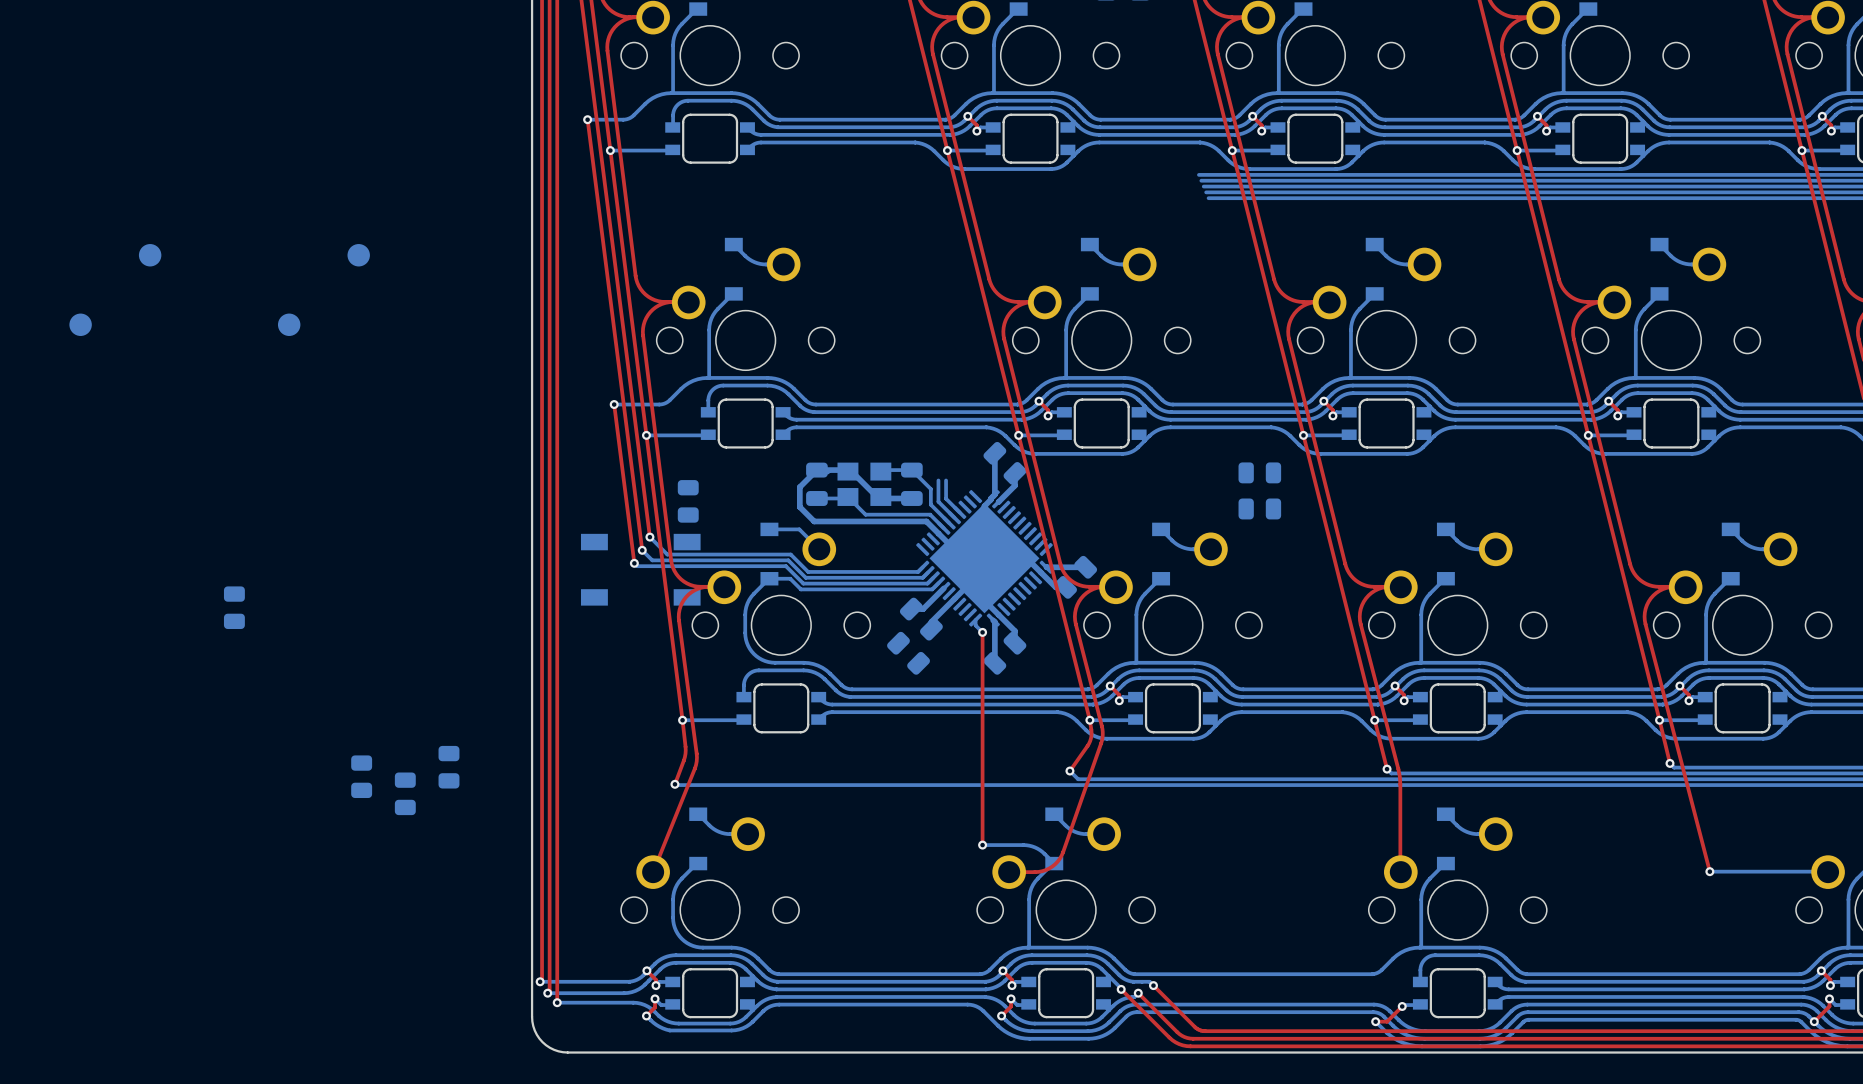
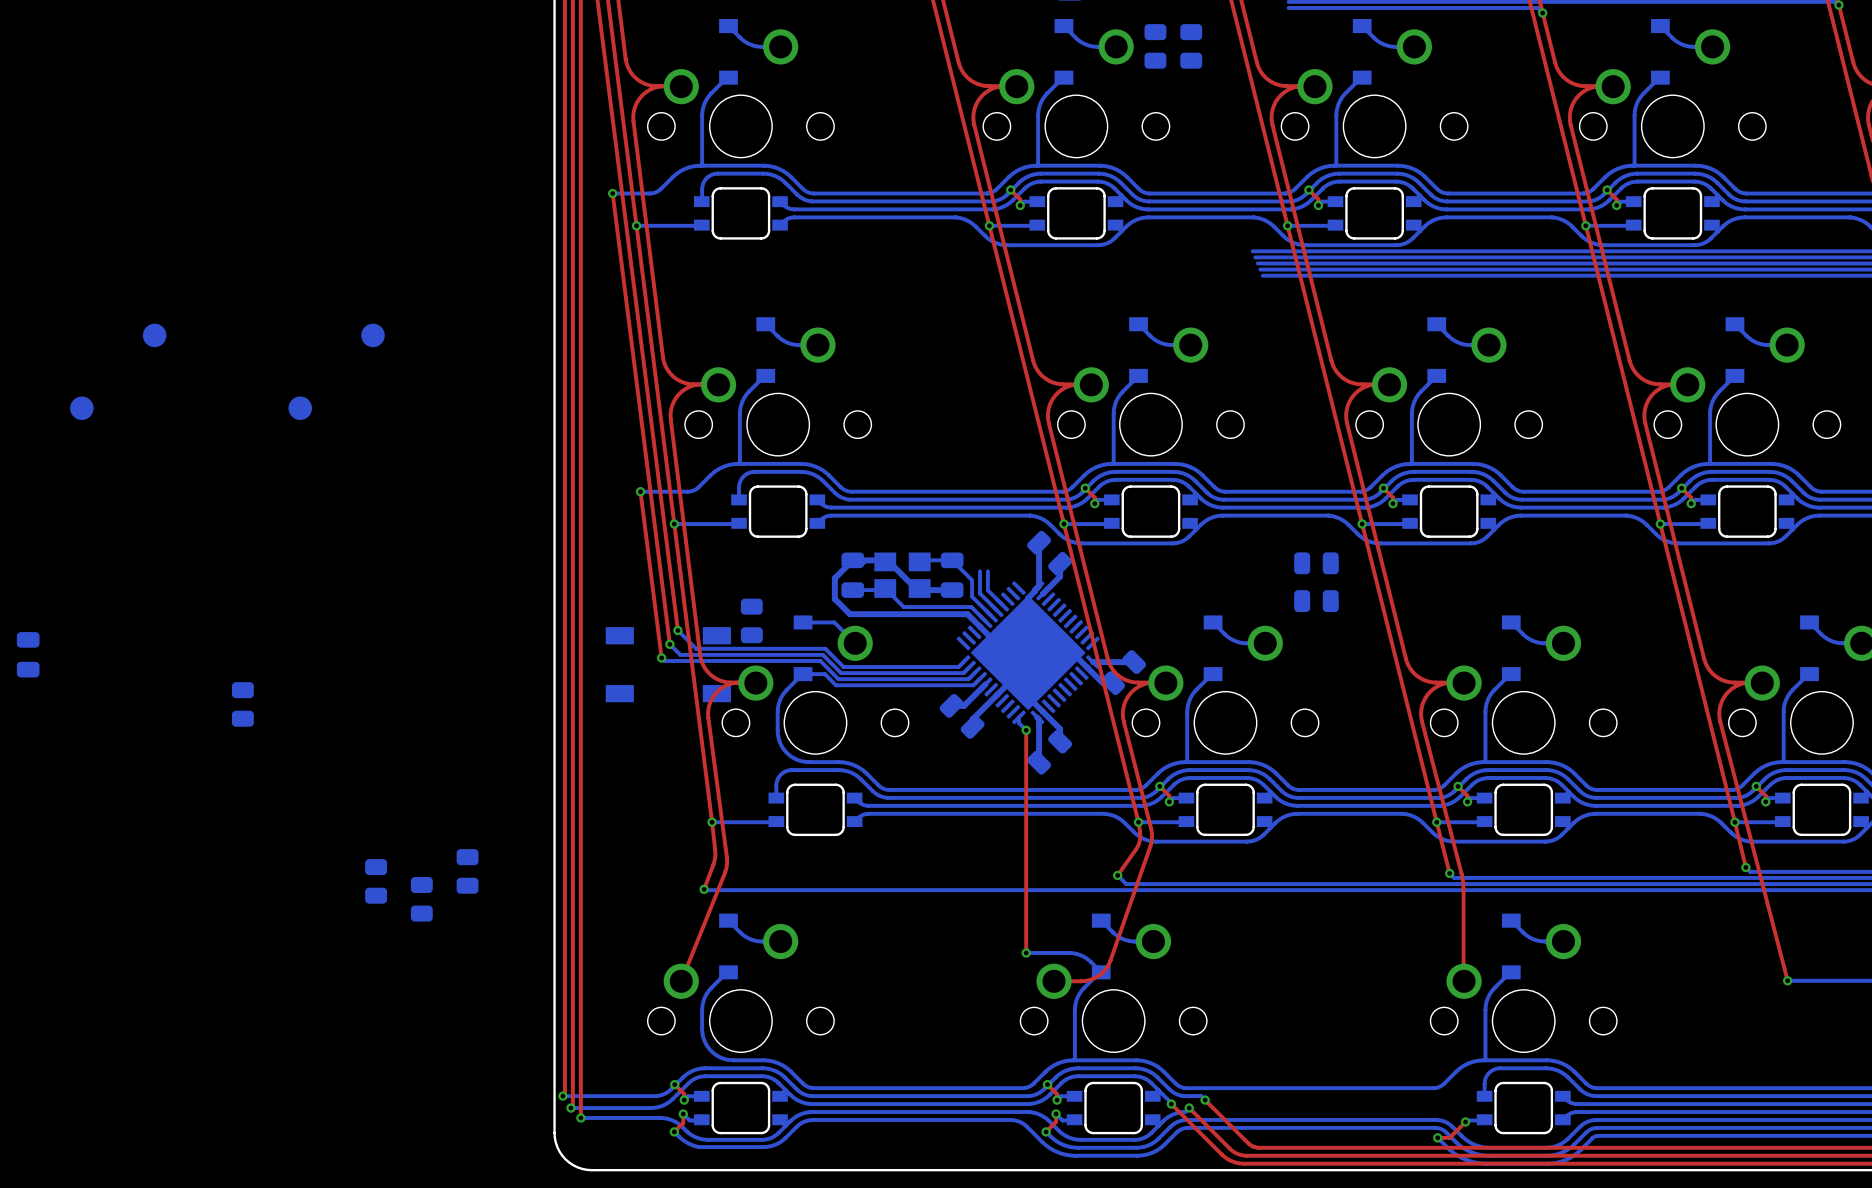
part position: (688, 501) -> (751, 620)
part: none -> (28, 654)
part: (908, 653) -> none

